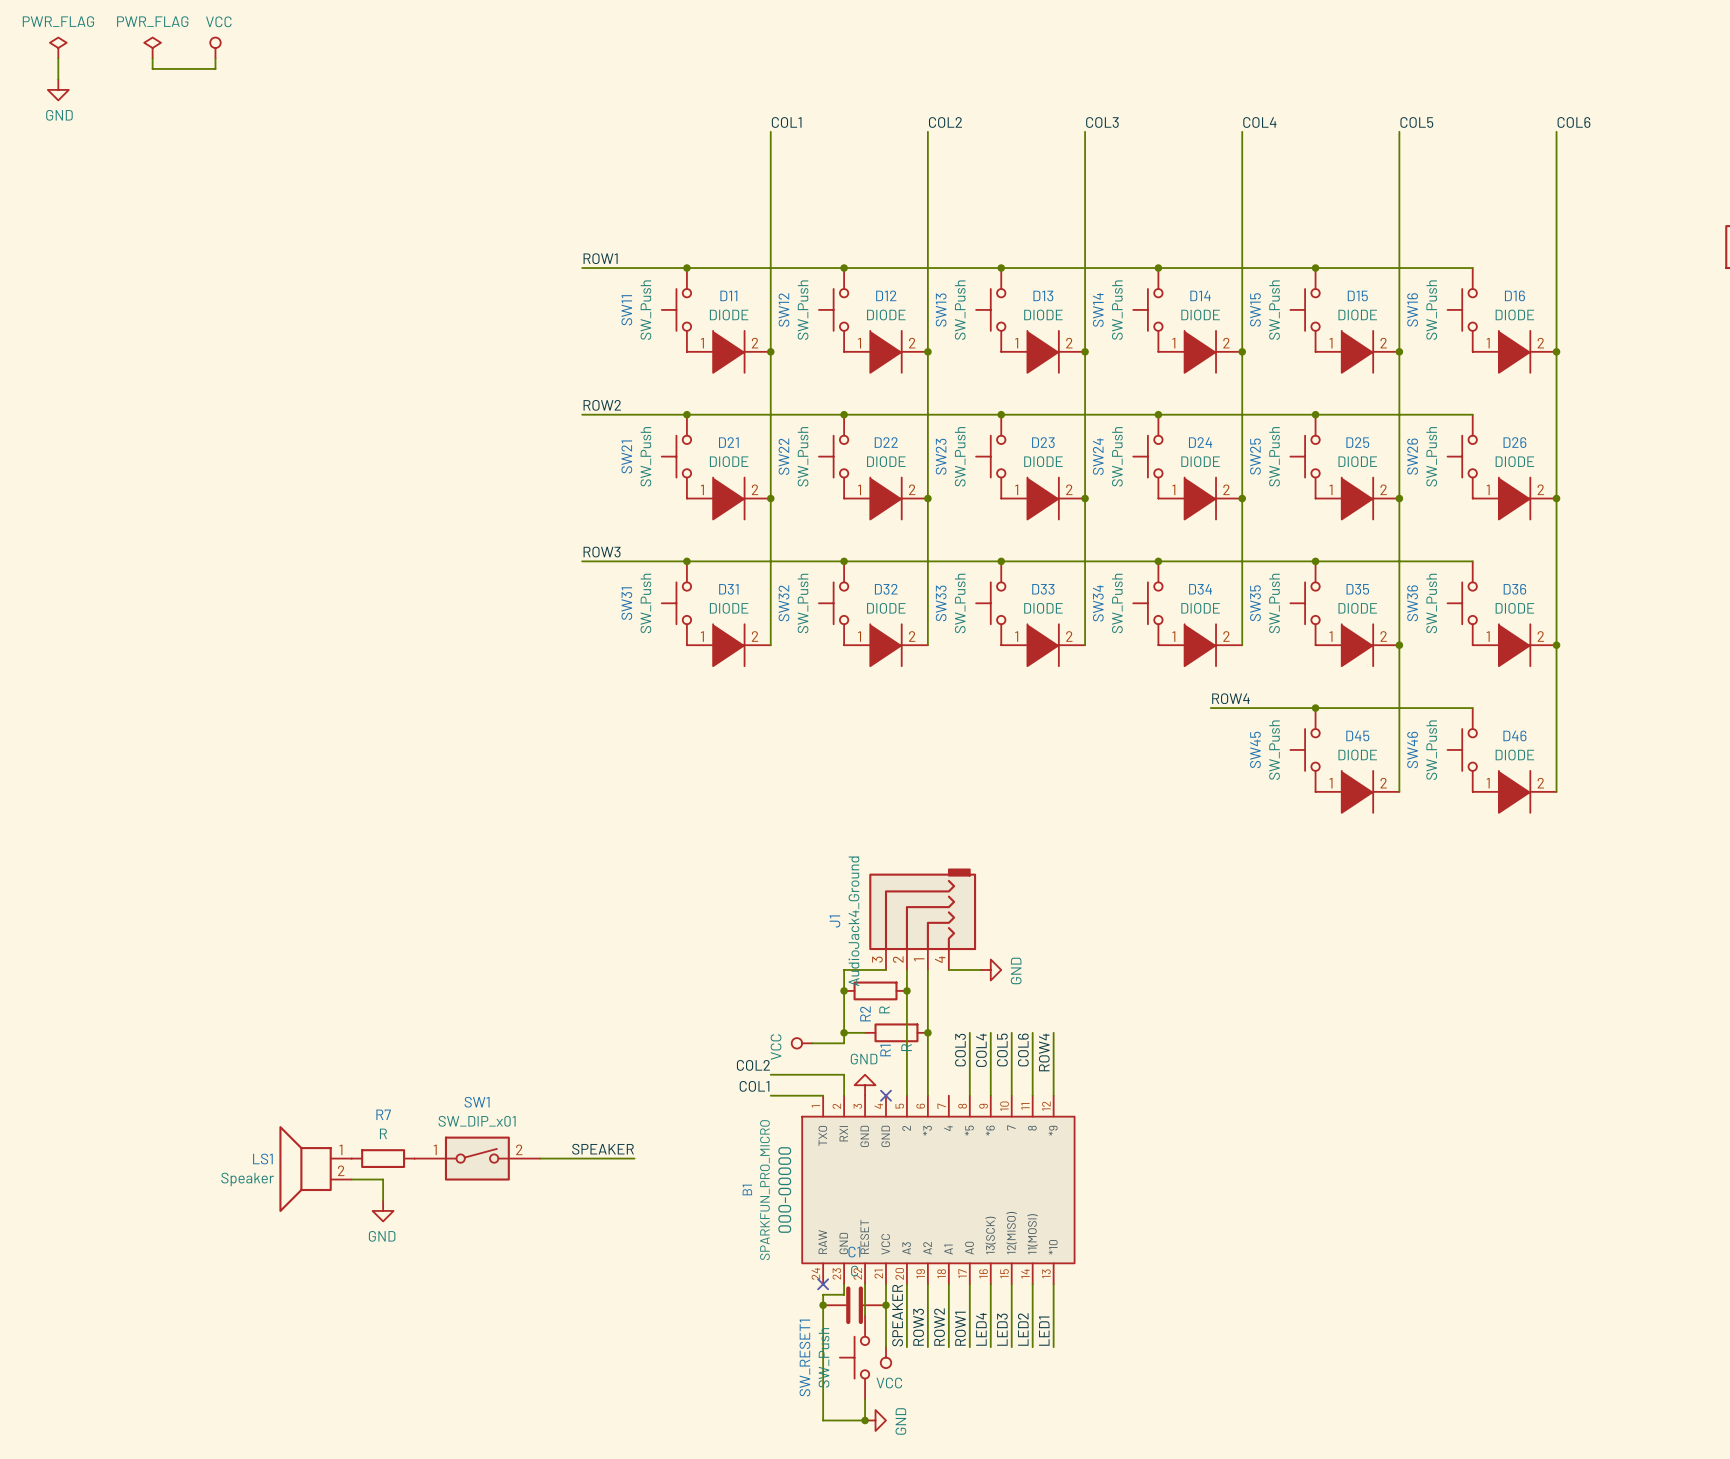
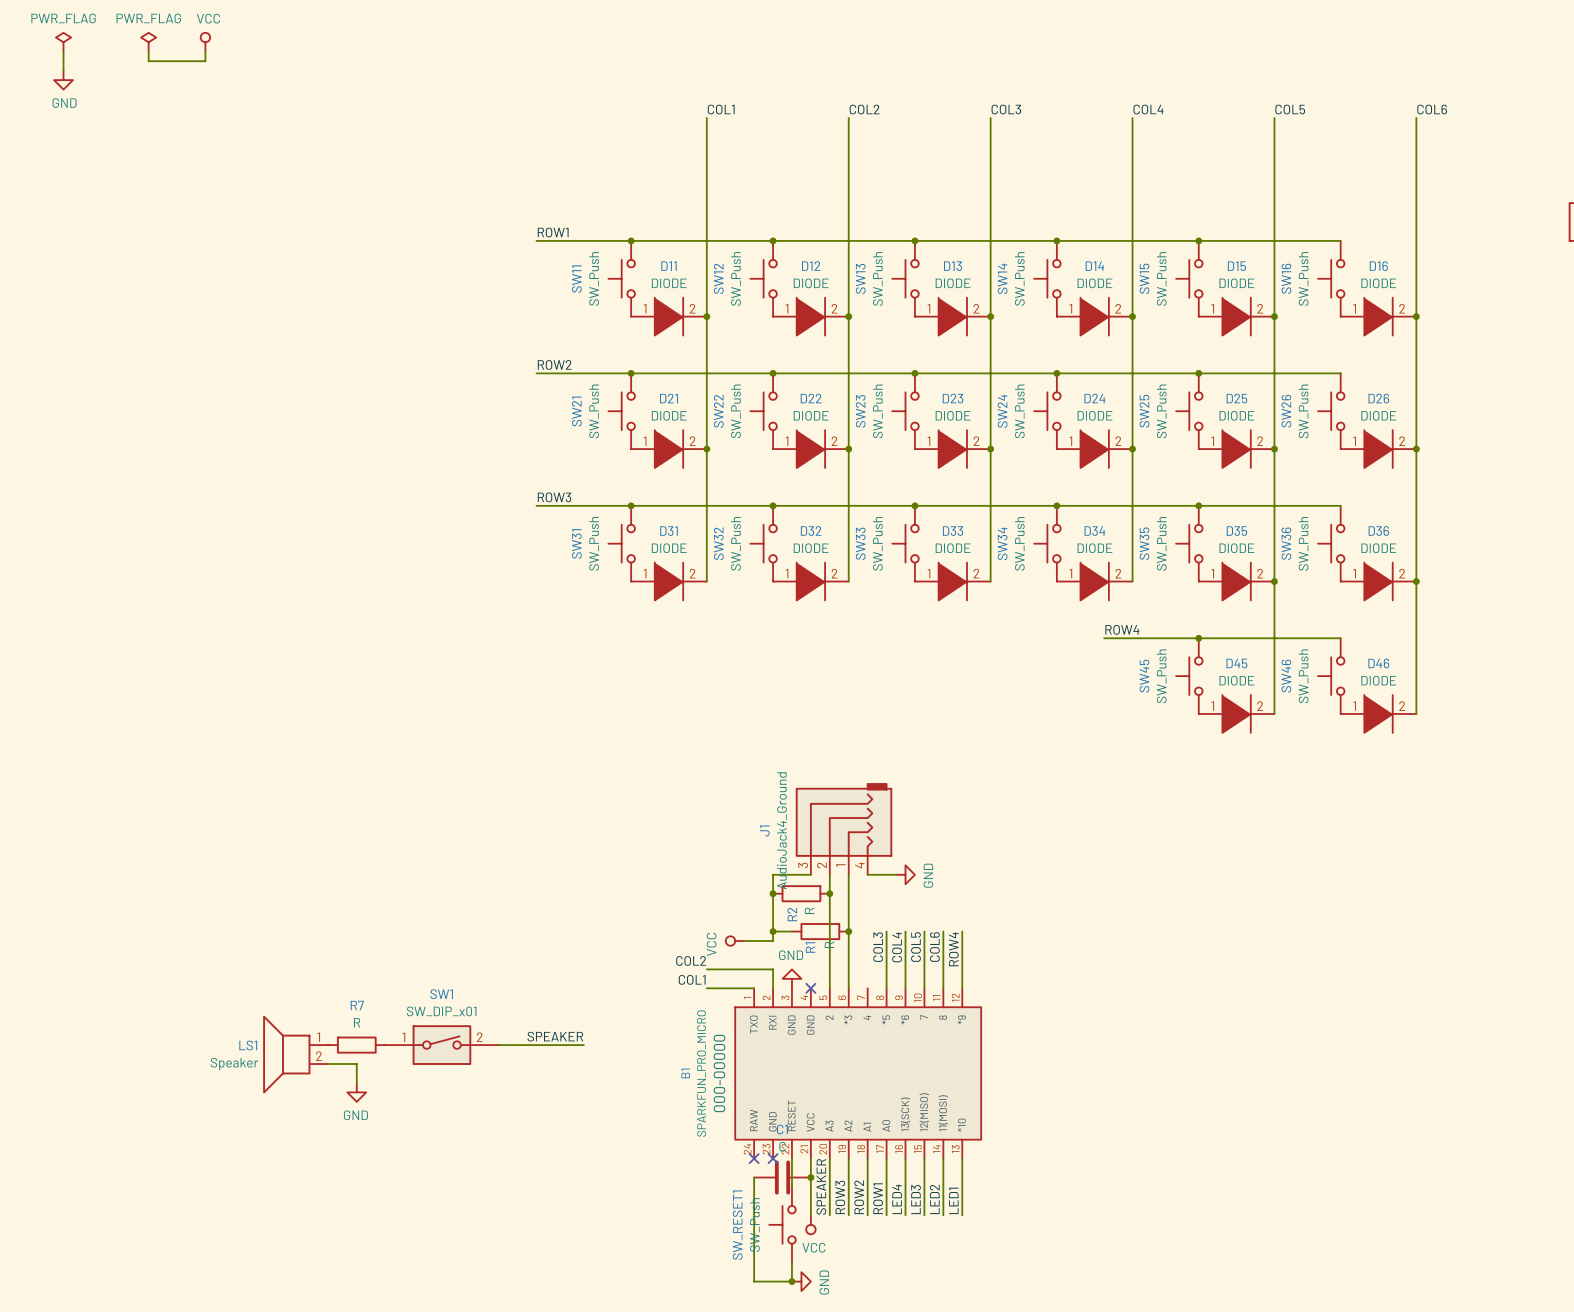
wire: (844, 1284) (844, 1294) (823, 1294) (823, 1305) -> none
no-connect mark: none -> (773, 1158)
junction: (823, 1305) -> none

